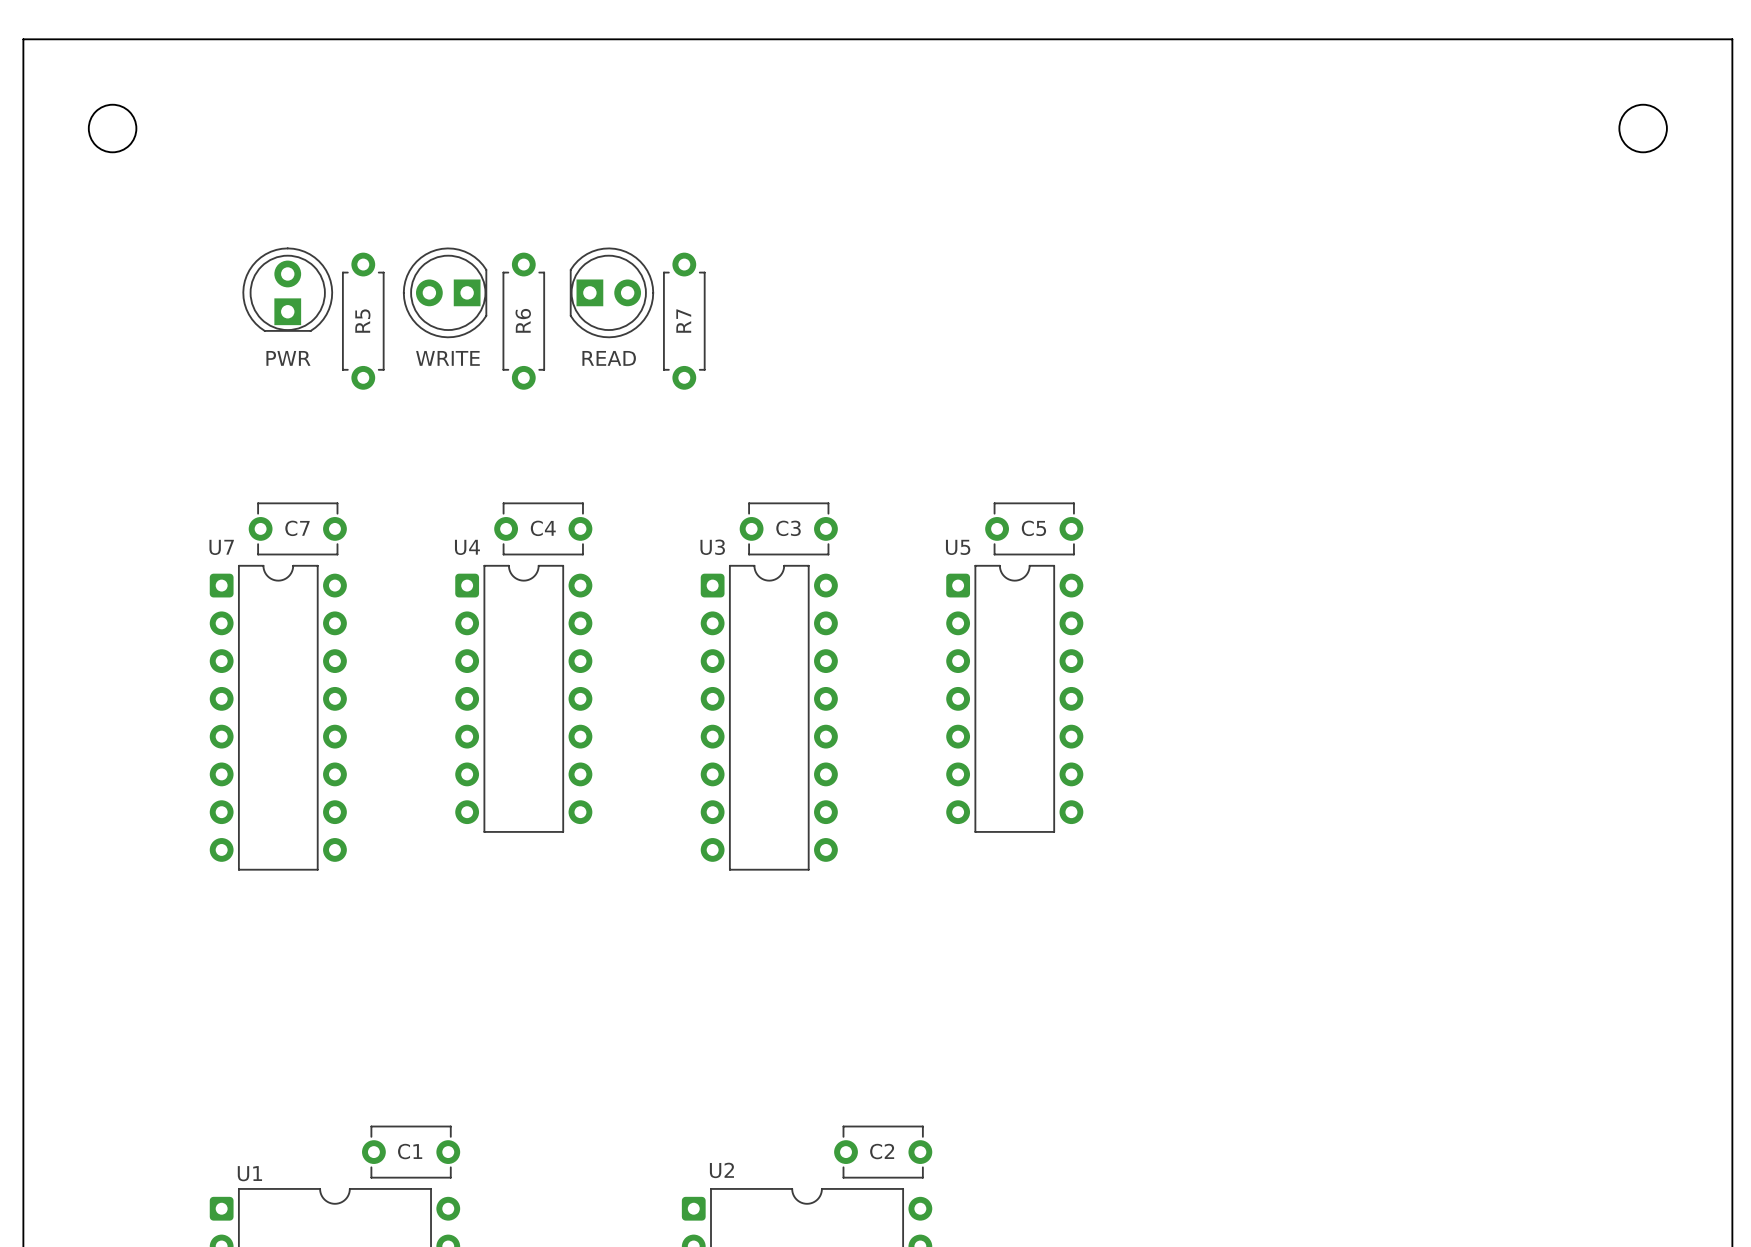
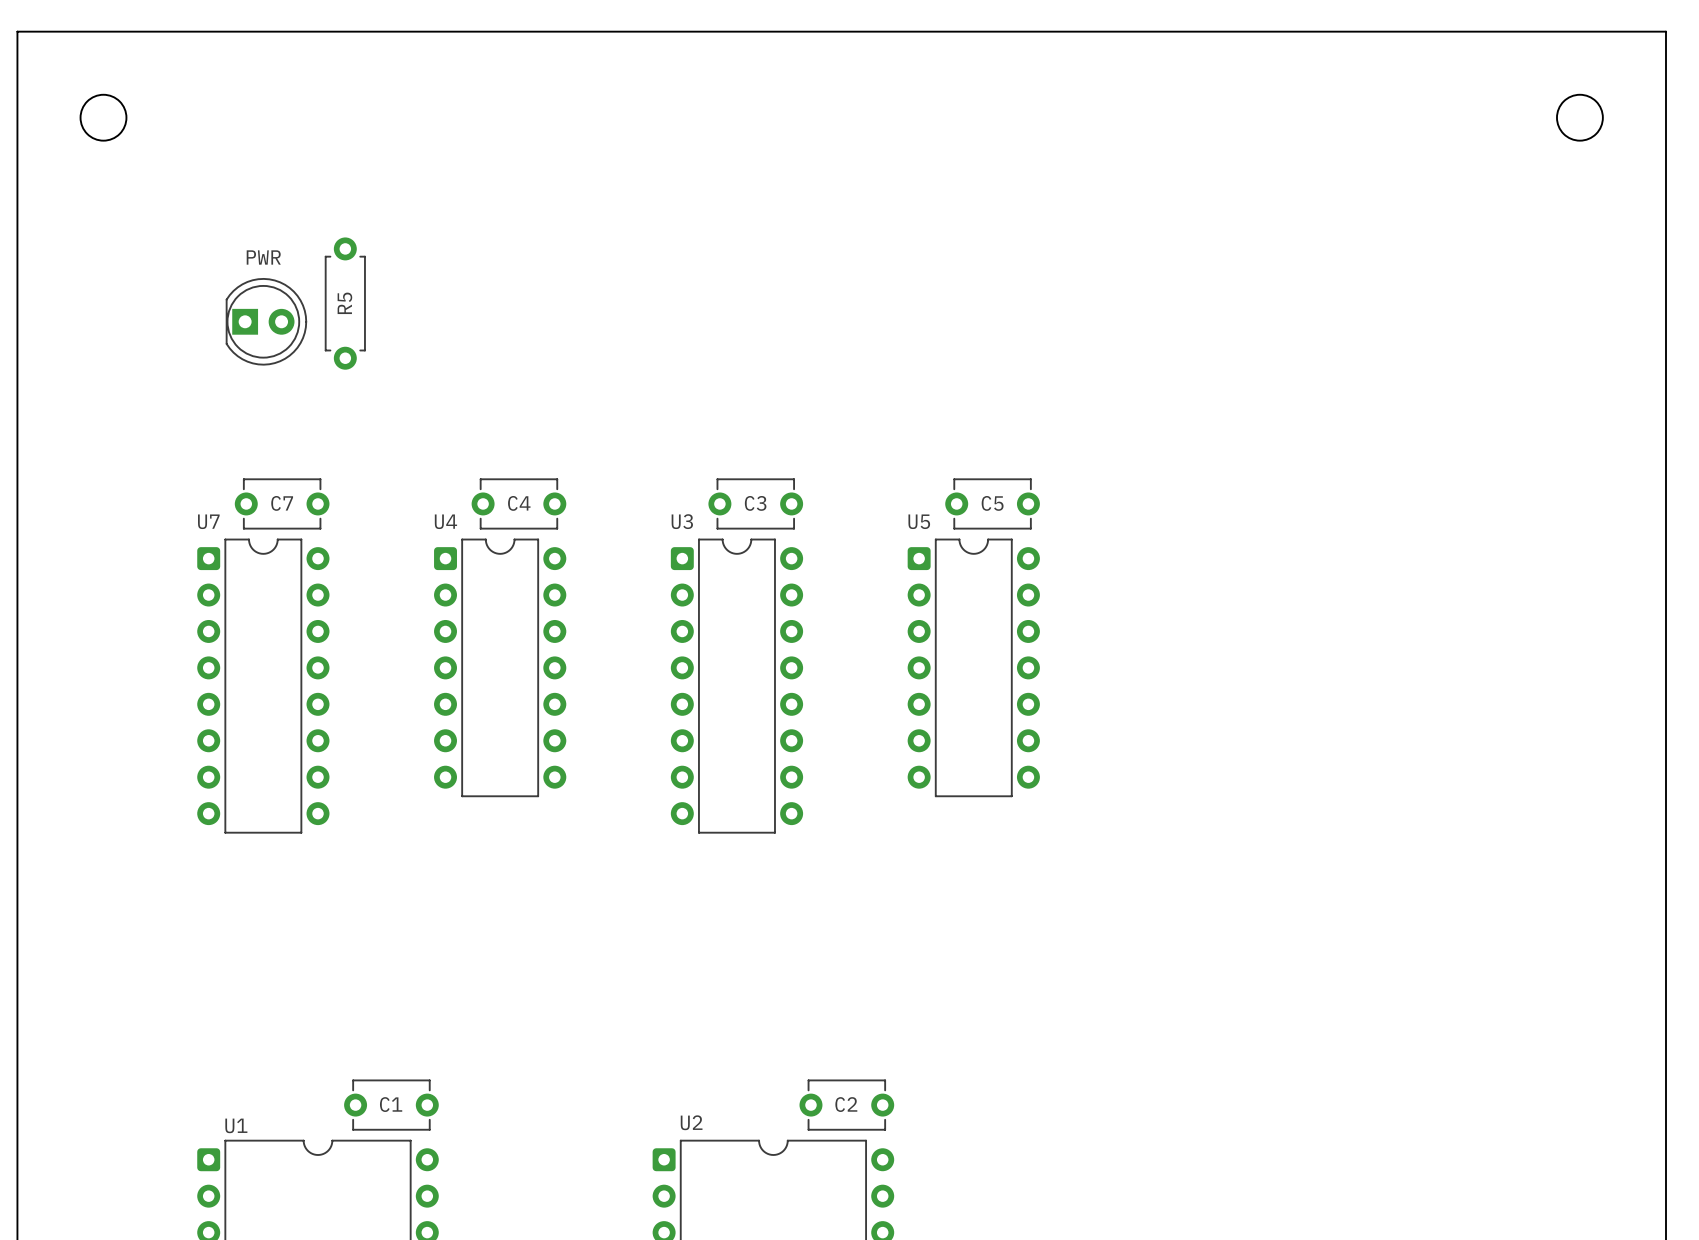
part rotation: 0° (287, 289) -> 90° clockwise (266, 321)
part: WRITE (445, 292) -> none
part: READ (611, 292) -> none
R6: (523, 321) -> none
R7: (684, 321) -> none
part value position: PWR (288, 358) -> PWR (263, 257)

